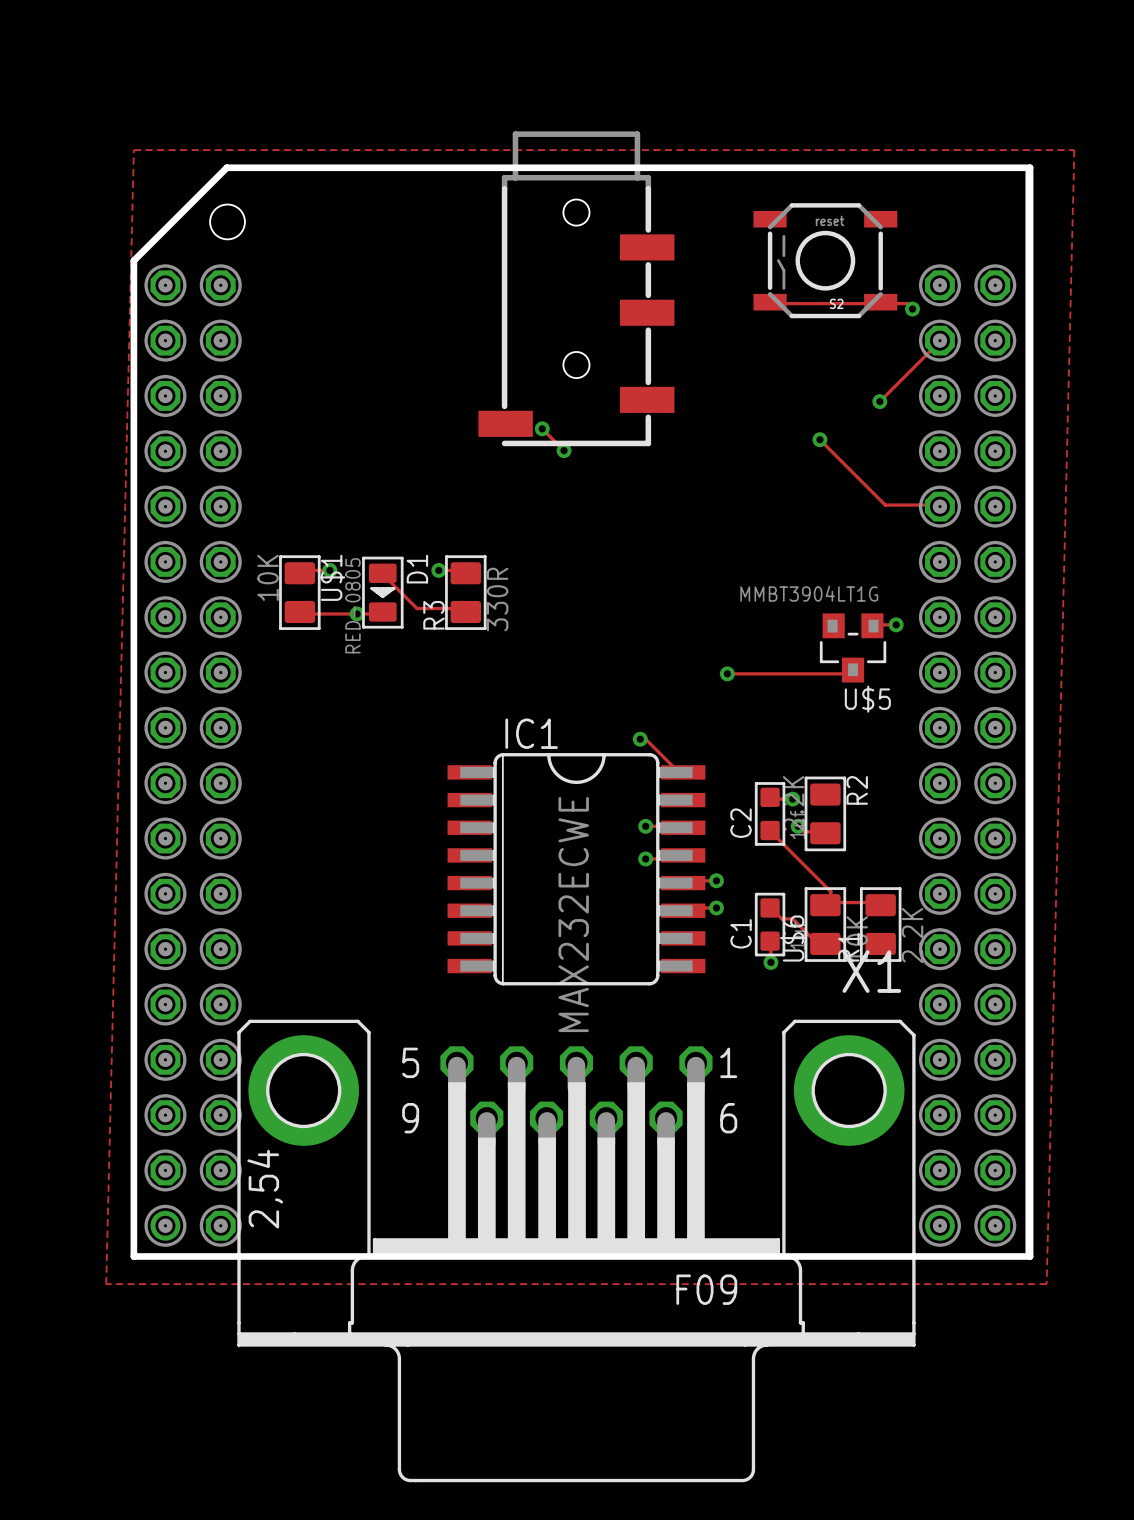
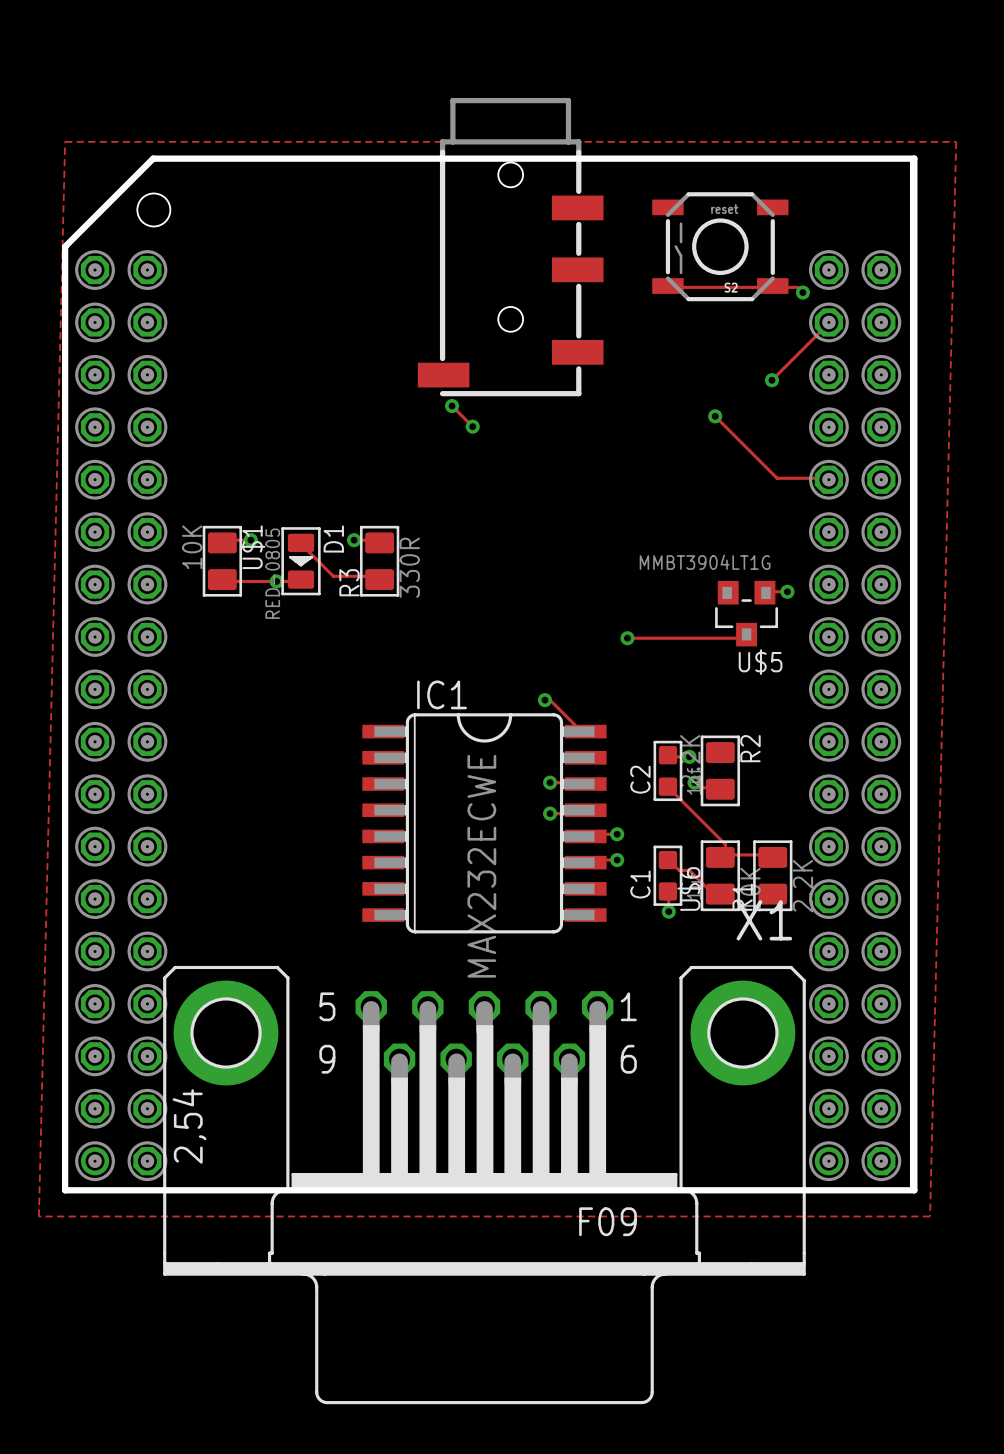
part position: (576, 288) -> (510, 247)

